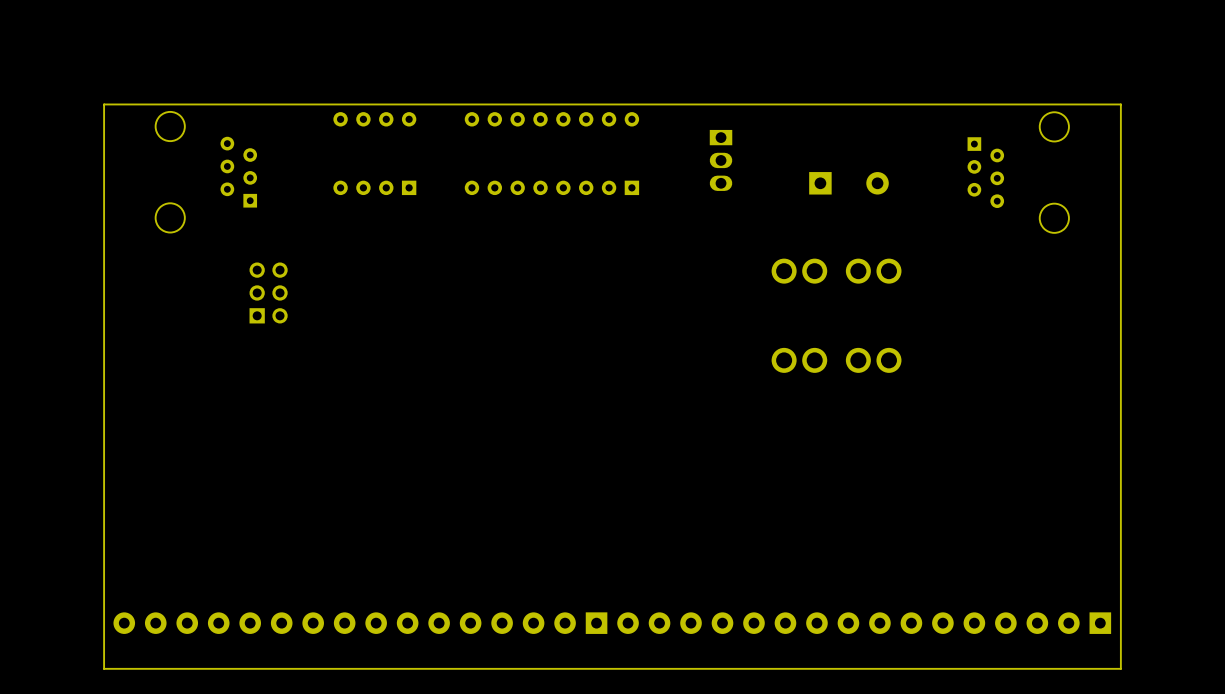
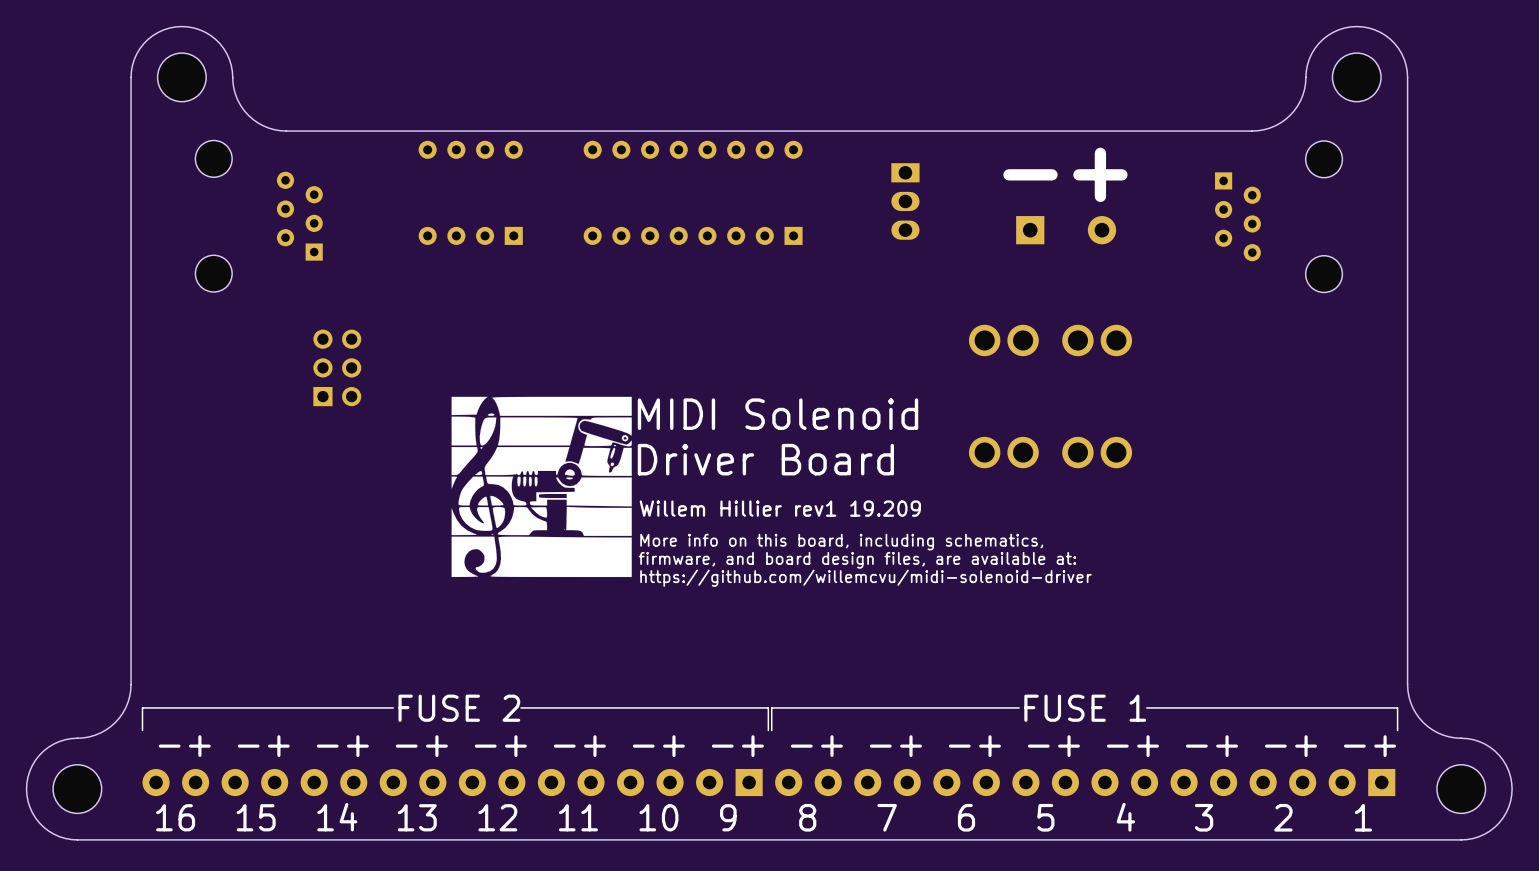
part: none -> (181, 77)
part: none -> (1356, 77)
board edge: (1120, 104) (104, 104) (104, 668) -> (1407, 131) (1407, 77) (1404, 59) (1390, 39) (1374, 29) (1362, 26) (1338, 29) (1323, 39) (1309, 59) (1302, 95) (1294, 110) (1275, 125) (1252, 131) (280, 130) (257, 122) (240, 105) (234, 89) (229, 59) (215, 39) (205, 32) (188, 26) (175, 26) (158, 32) (140, 48) (134, 59) (131, 77) (129, 696) (119, 718) (105, 730) (89, 736) (59, 741) (43, 751) (29, 771) (26, 789) (29, 807) (35, 817) (53, 834) (71, 839) (130, 839)
text: none -> -+ (1065, 174)
drawing: none -> [451, 396, 632, 578]
text: none -> MIDI Solenoid (777, 414)
text: none -> Driver Board (765, 459)
text: none -> Willem Hillier rev1 19.209 (780, 508)
text: none -> More info on this board, including schematics, (841, 542)
text: none -> firmware, and board design files, are available at: (857, 560)
text: none -> https://github.com/willemcvu/midi-solenoid-driver (865, 578)
board edge: (1120, 545) (1120, 668) -> (1407, 684) (1410, 702) (1423, 722) (1443, 735) (1473, 739) (1490, 747) (1506, 765) (1512, 789) (1508, 807) (1503, 817) (1484, 834) (1467, 839) (1407, 839)
line: none -> (393, 707) (142, 707) (142, 730)
text: none -> FUSE 2 (459, 708)
line: none -> (520, 707) (768, 707) (768, 730)
line: none -> (1019, 707) (771, 707) (771, 730)
text: none -> FUSE 1 (1085, 708)
line: none -> (1146, 707) (1397, 707) (1397, 730)
text: none -> -+ -+ -+ -+ -+ -+ -+ -+ -+ -+ -+ -+ -+ -+ -+ -+ (777, 746)
part: none -> (77, 789)
part: none -> (1461, 789)
text: none -> 16 15 14 13 12 11 10 9 (446, 817)
text: none -> 8 7 6 5 4 3 2 1 (1085, 817)

